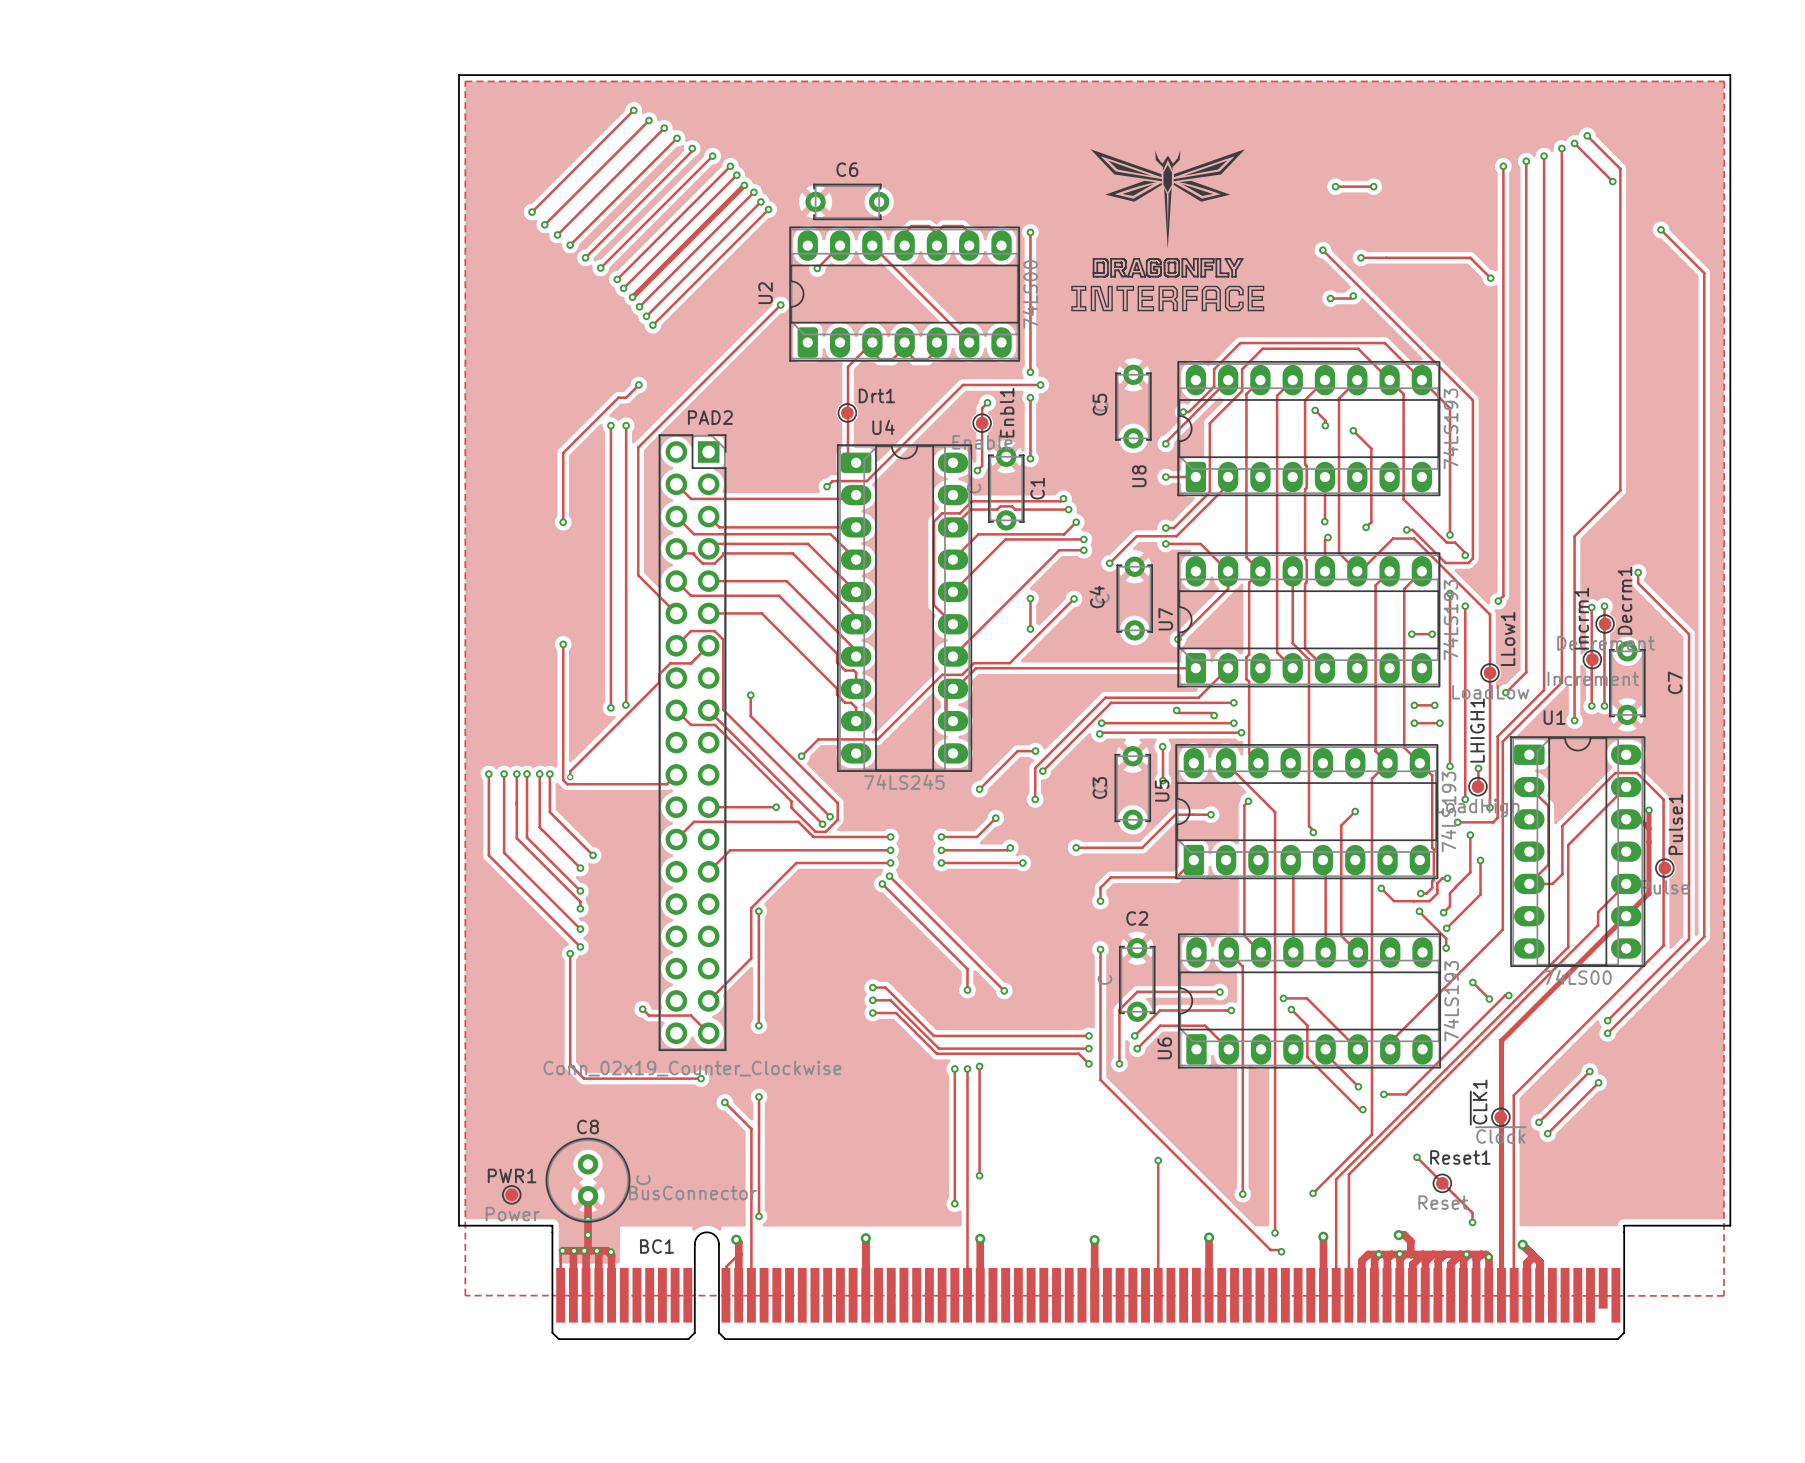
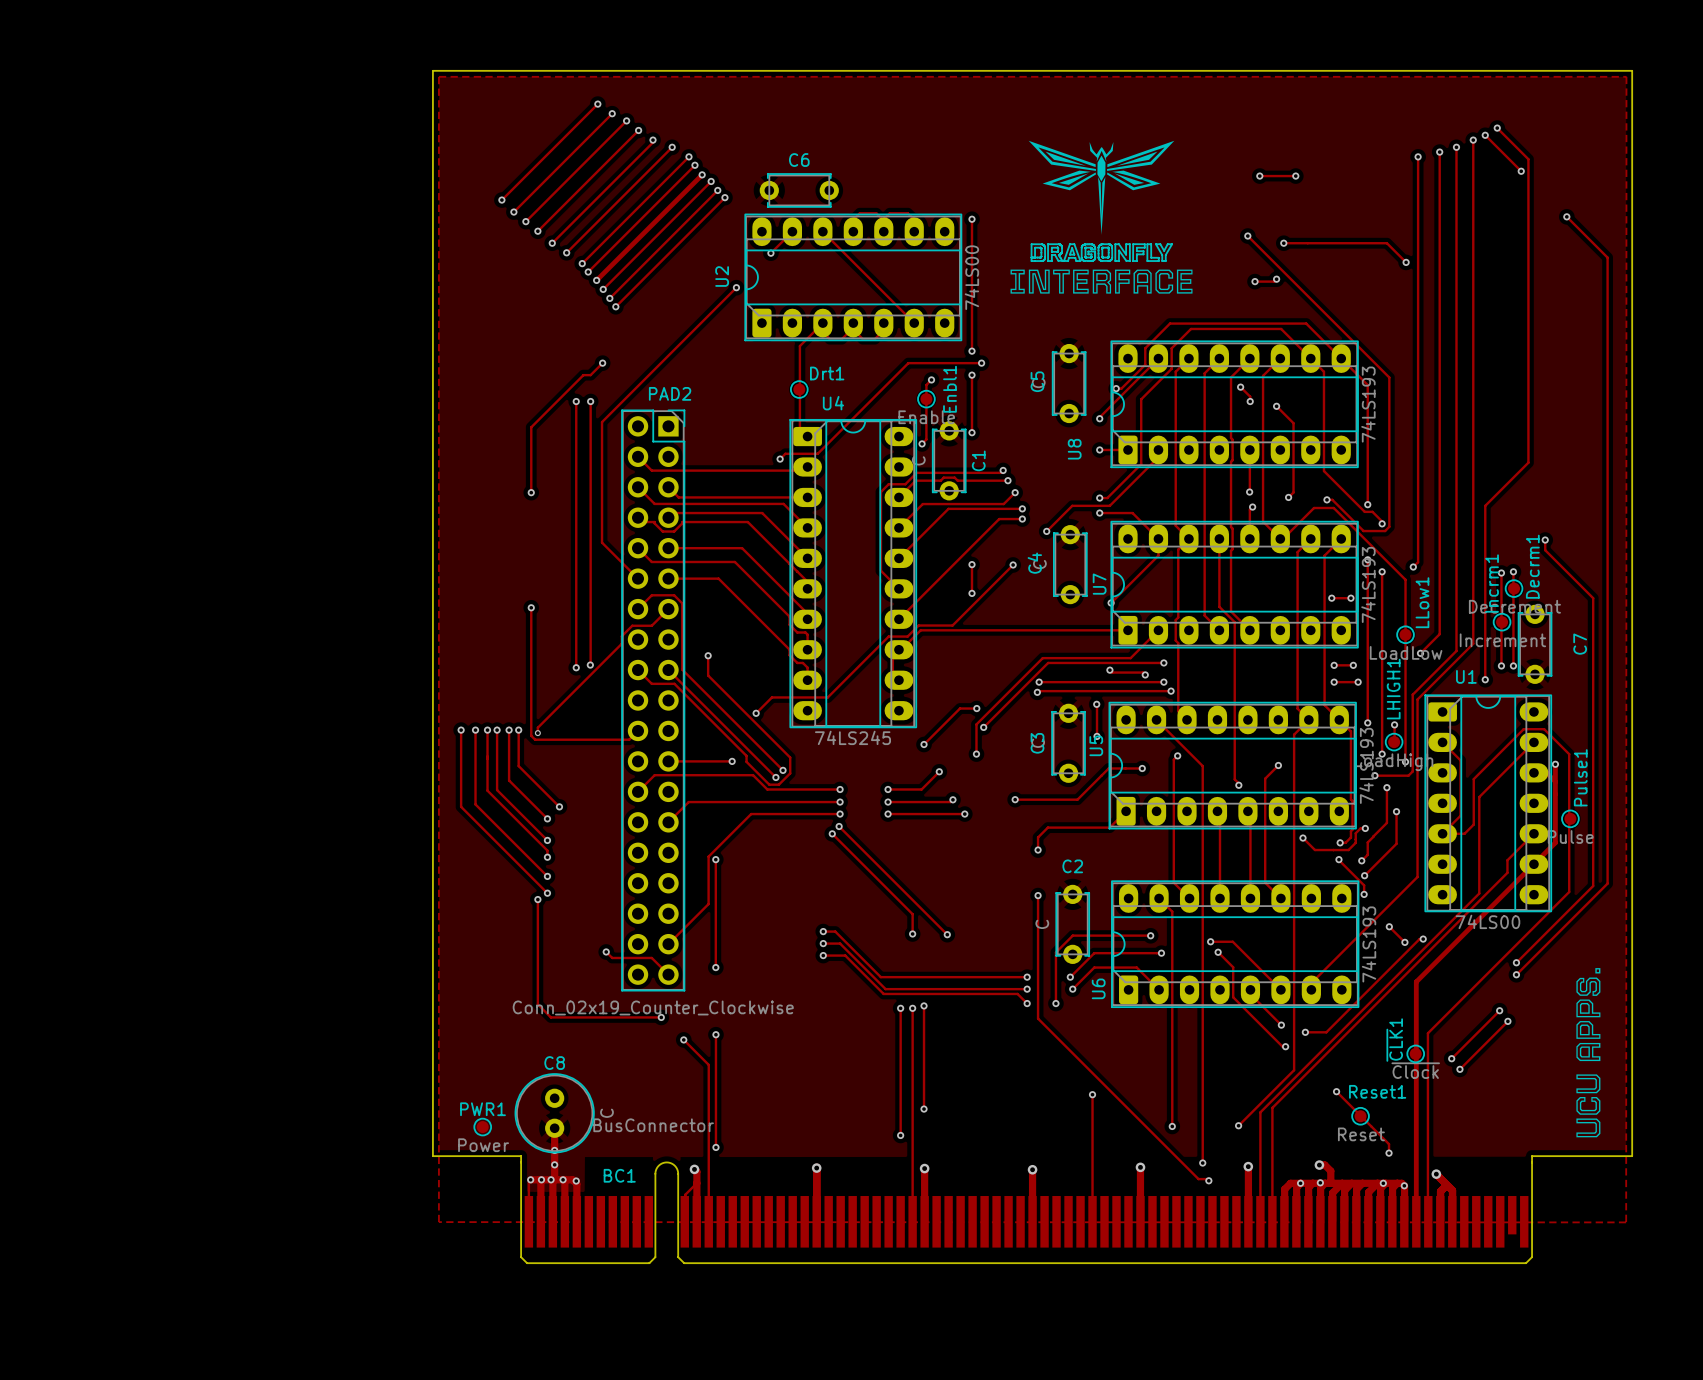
drawing: none -> [1576, 968, 1601, 1138]

